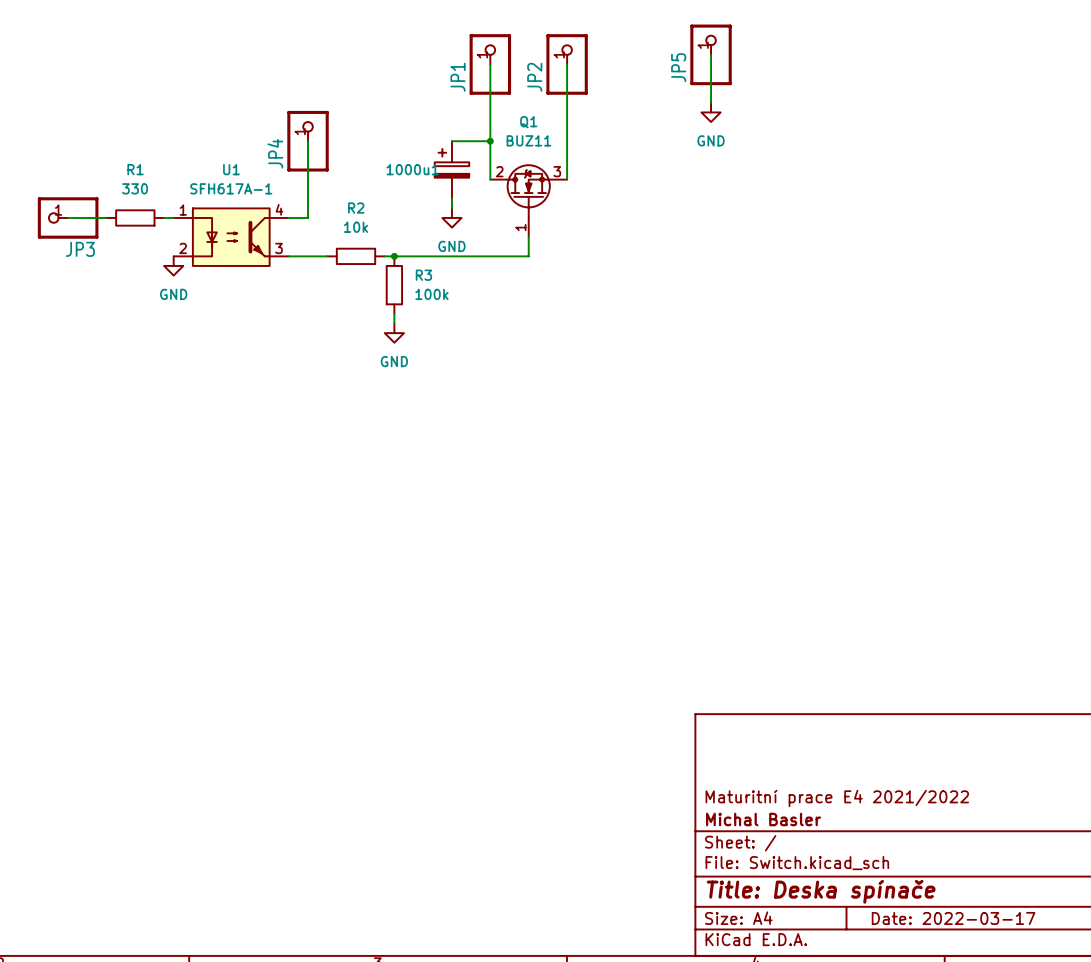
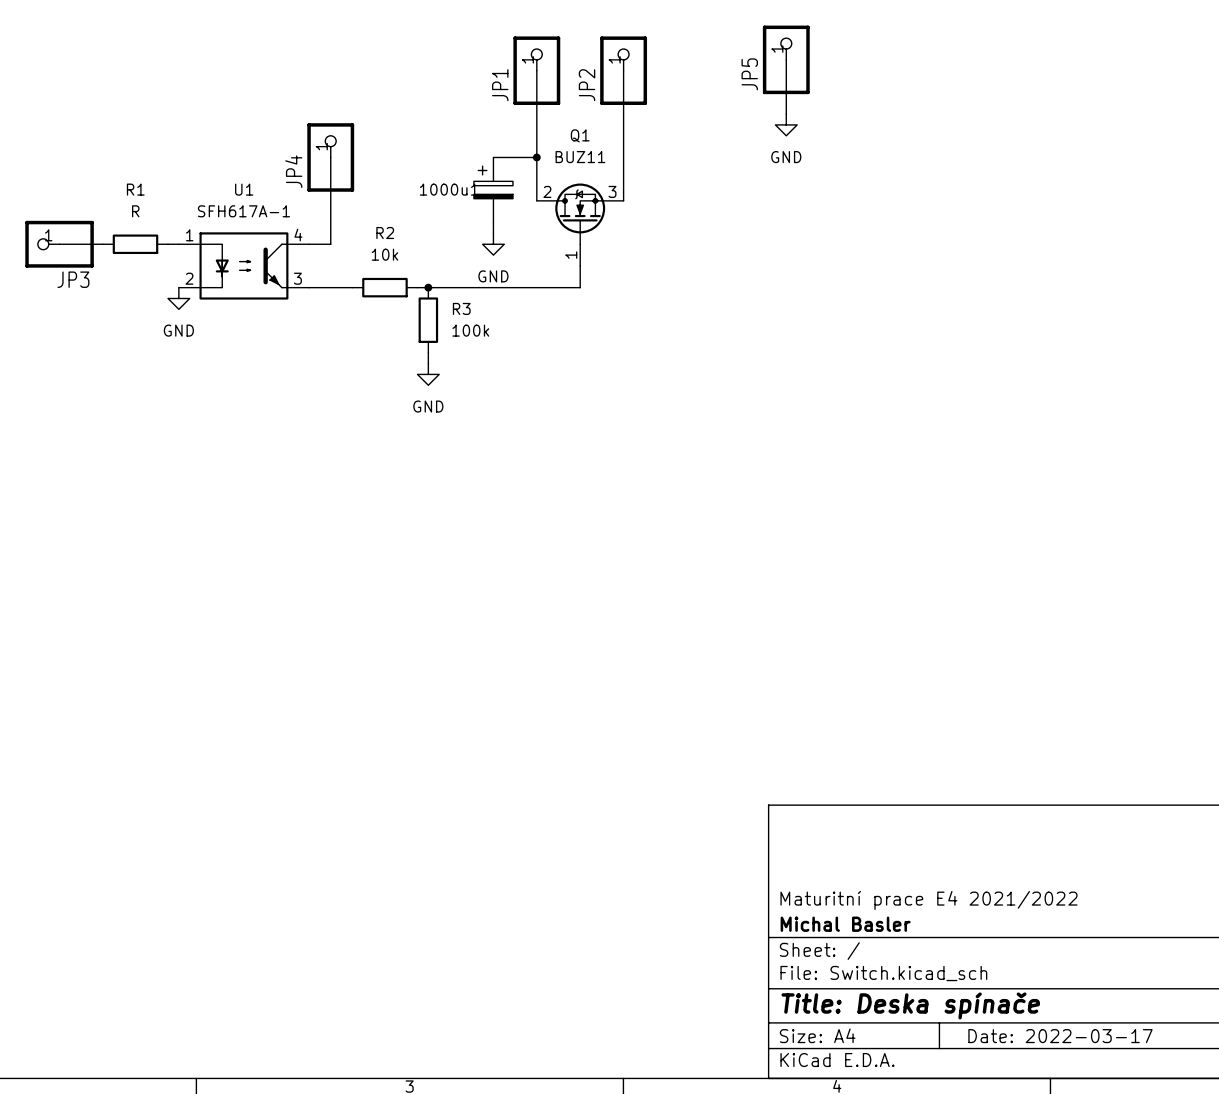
R1 value: 330 (135, 188) -> R (135, 211)

